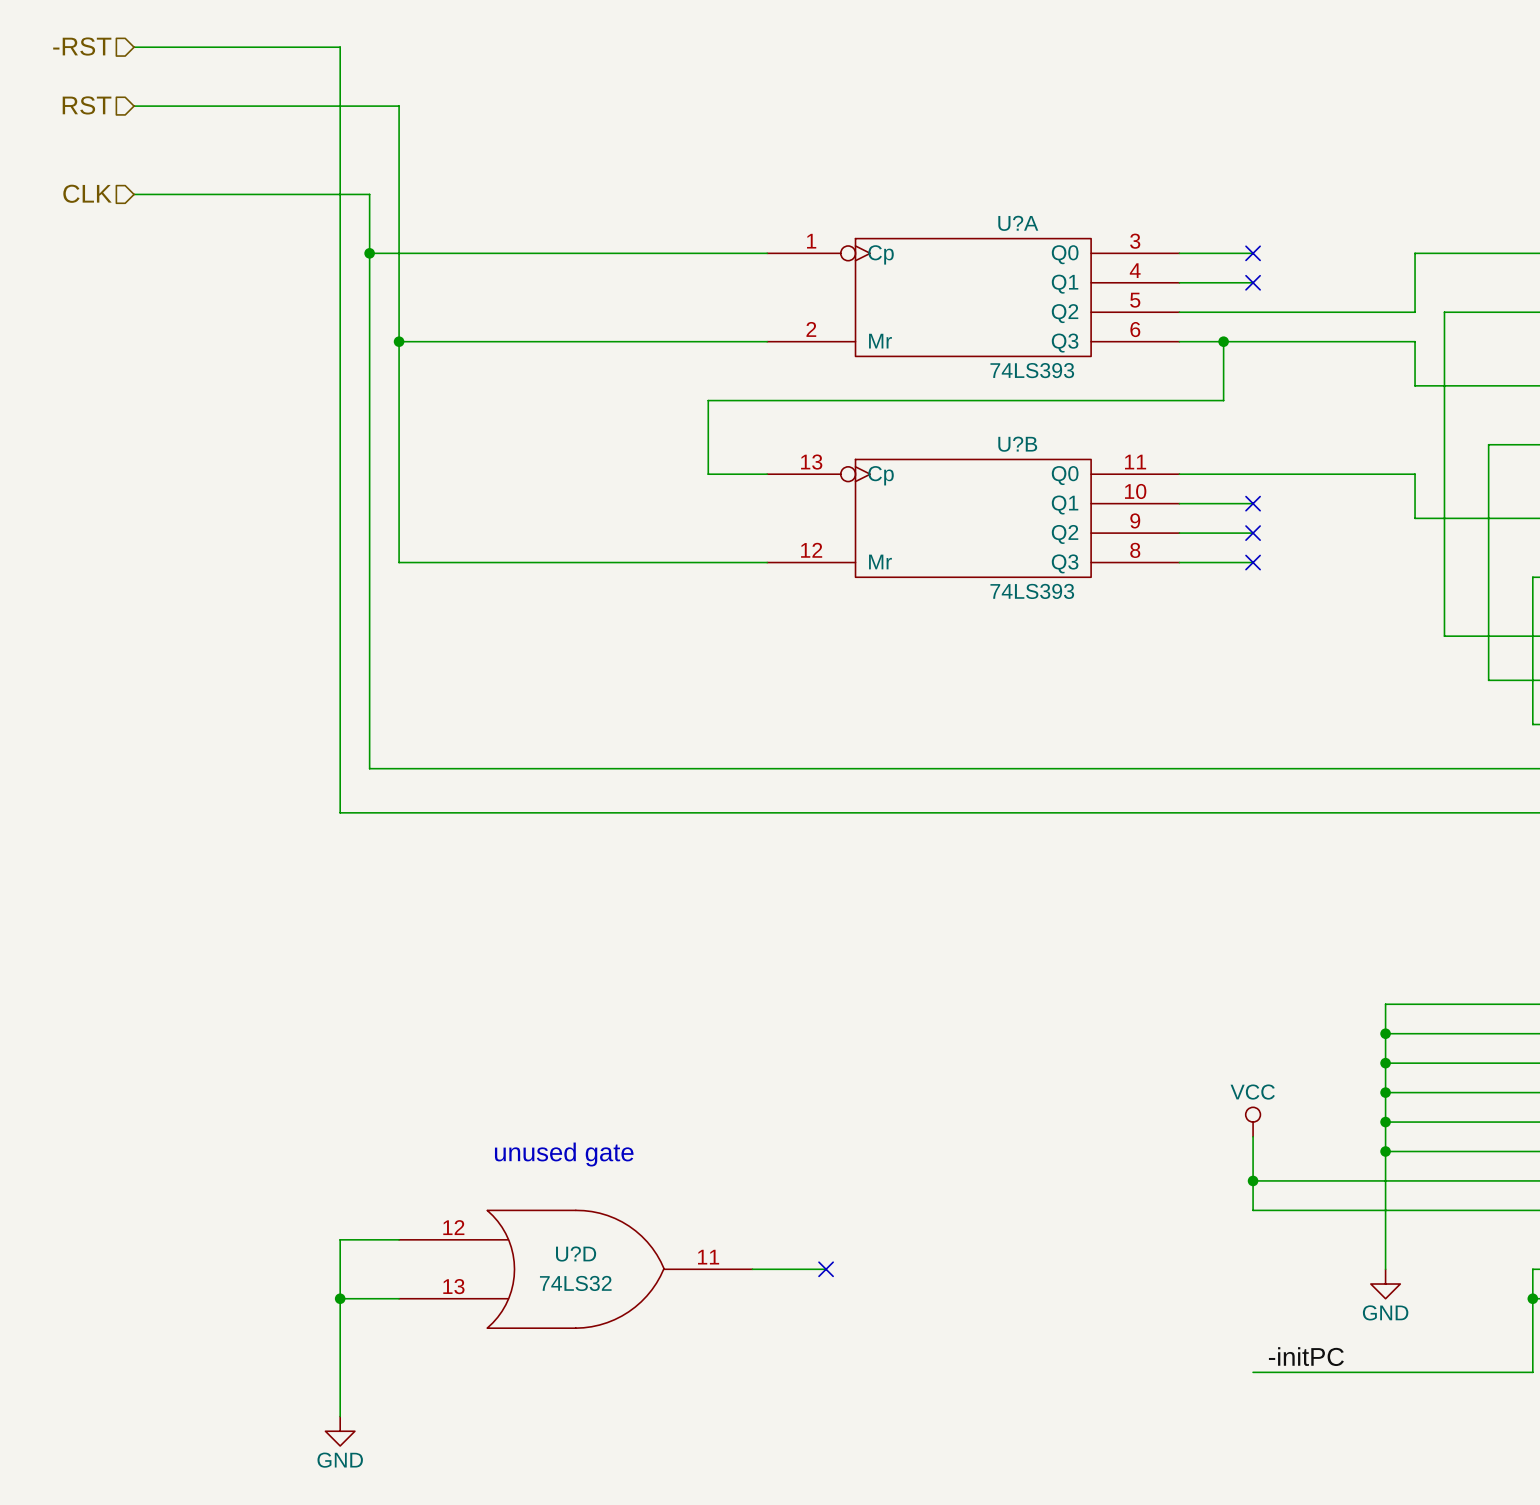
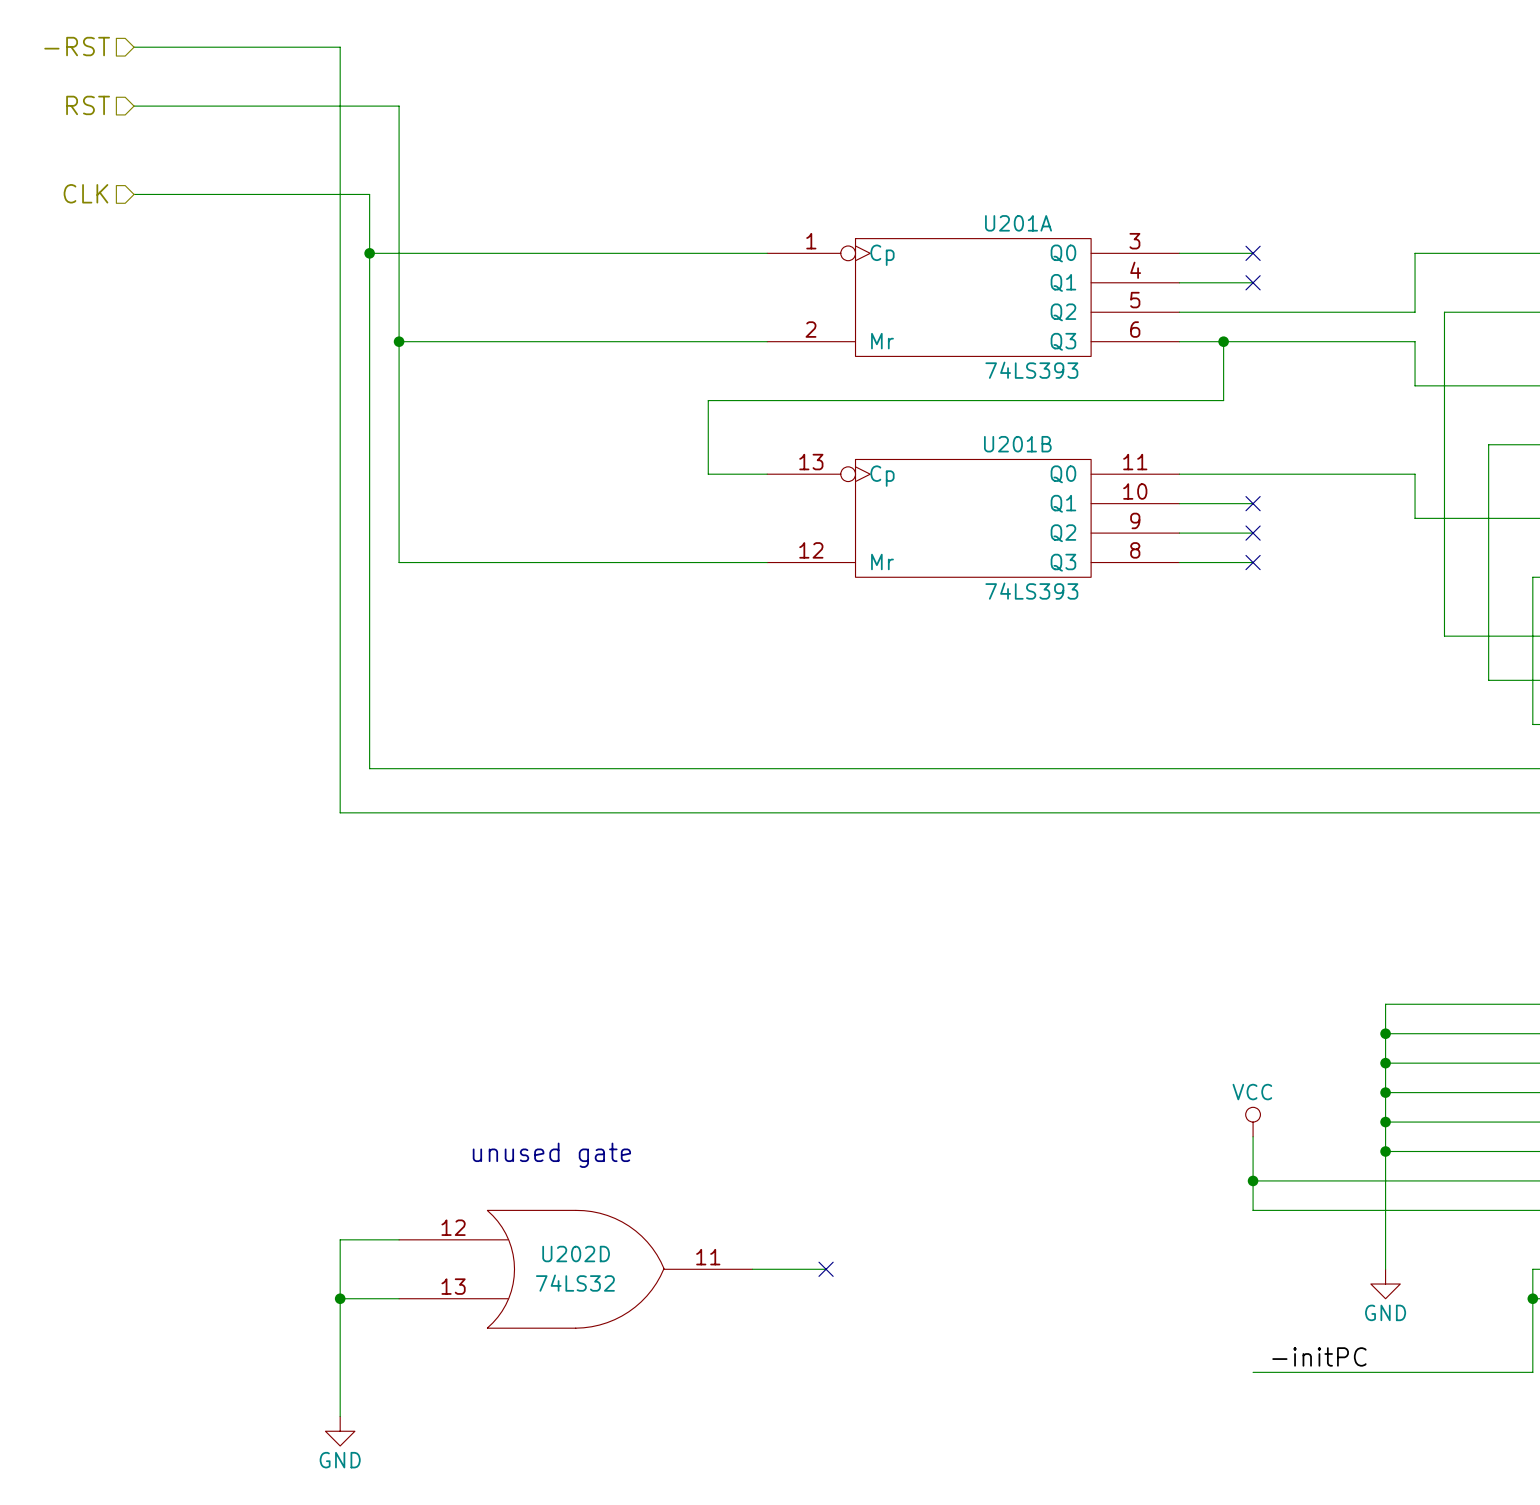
U?A name: U?A (1018, 223) -> U201A (1018, 223)
U?B name: U?B (1017, 444) -> U201B (1017, 444)
U?D name: U?D (576, 1254) -> U202D (576, 1254)

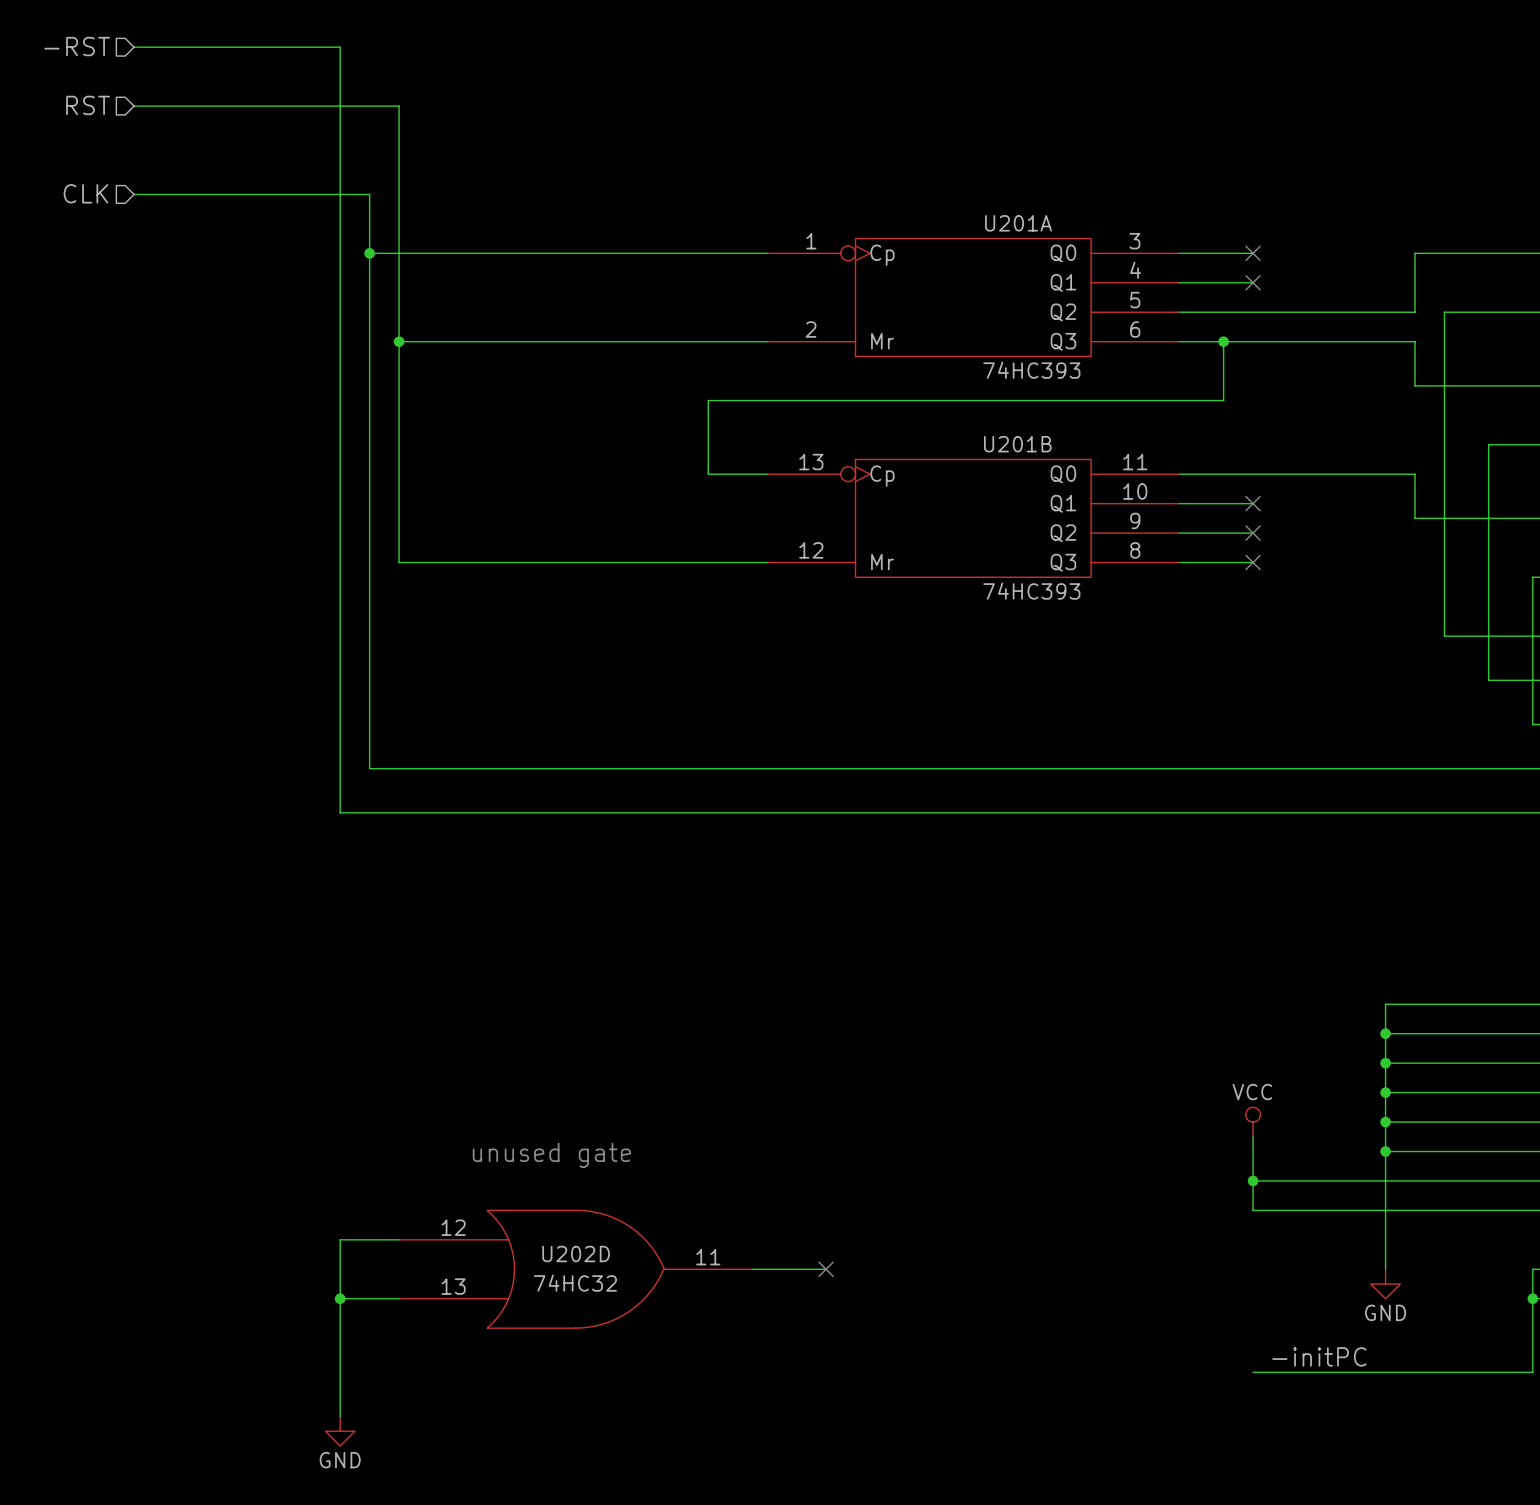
U201A value: 74LS393 (1031, 370) -> 74HC393 (1031, 370)
U201B value: 74LS393 (1031, 591) -> 74HC393 (1031, 591)
U202D value: 74LS32 (575, 1283) -> 74HC32 (575, 1283)

